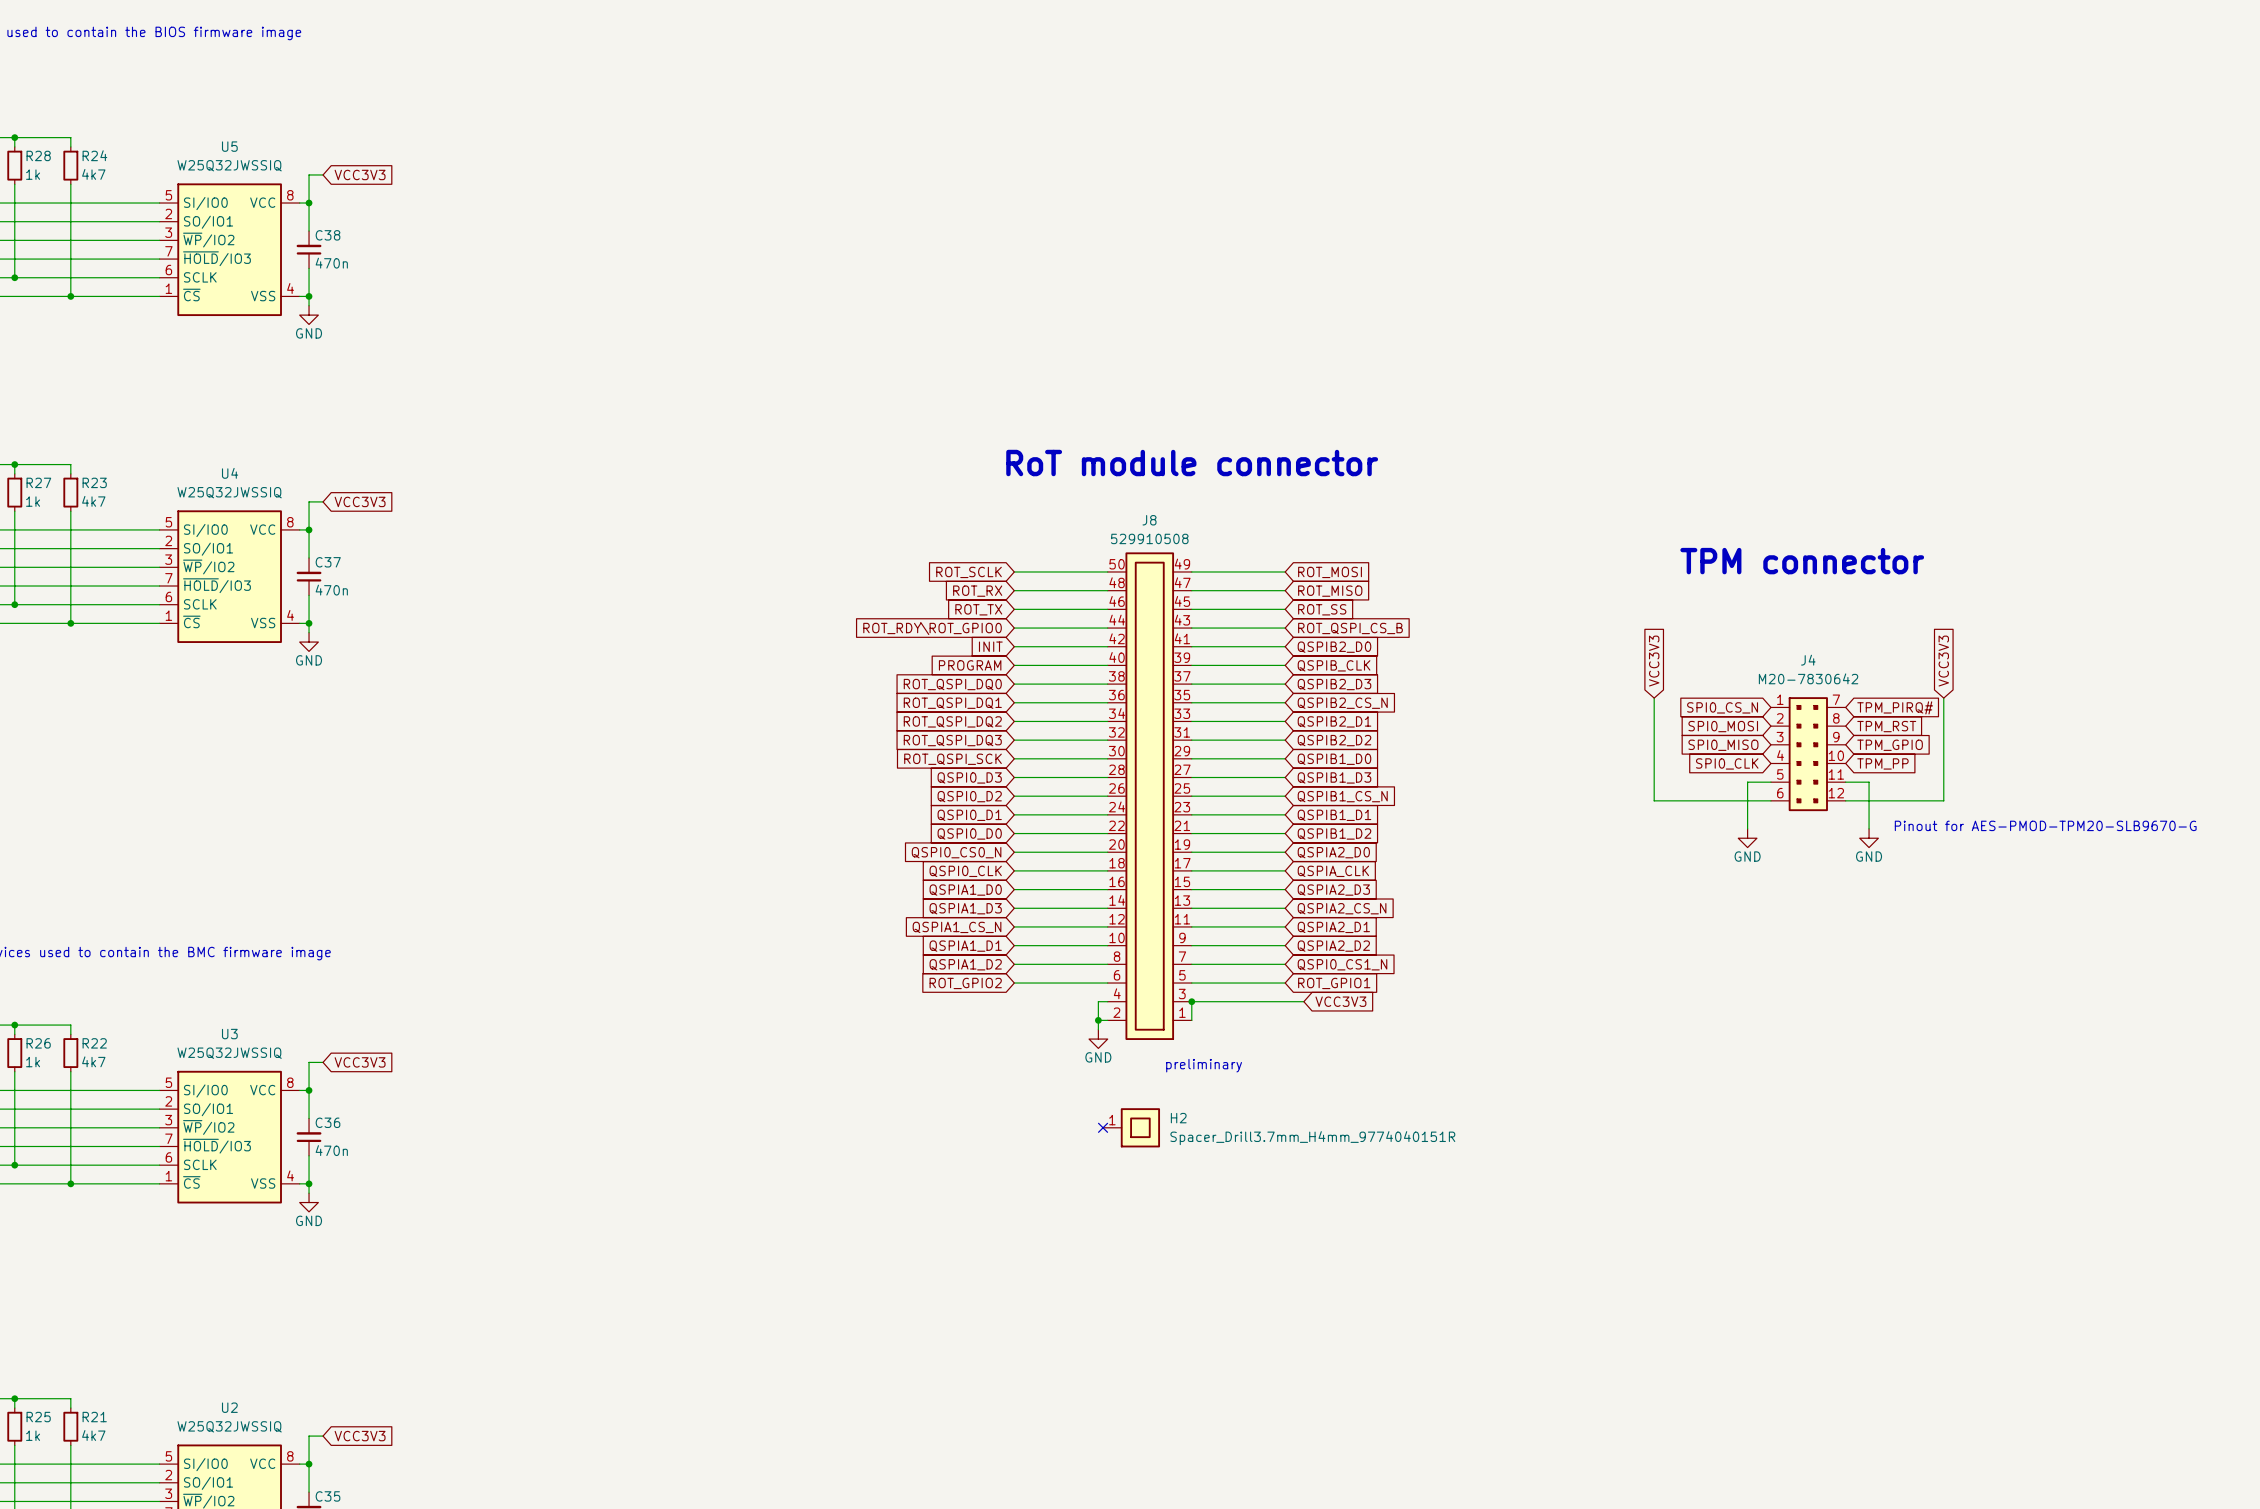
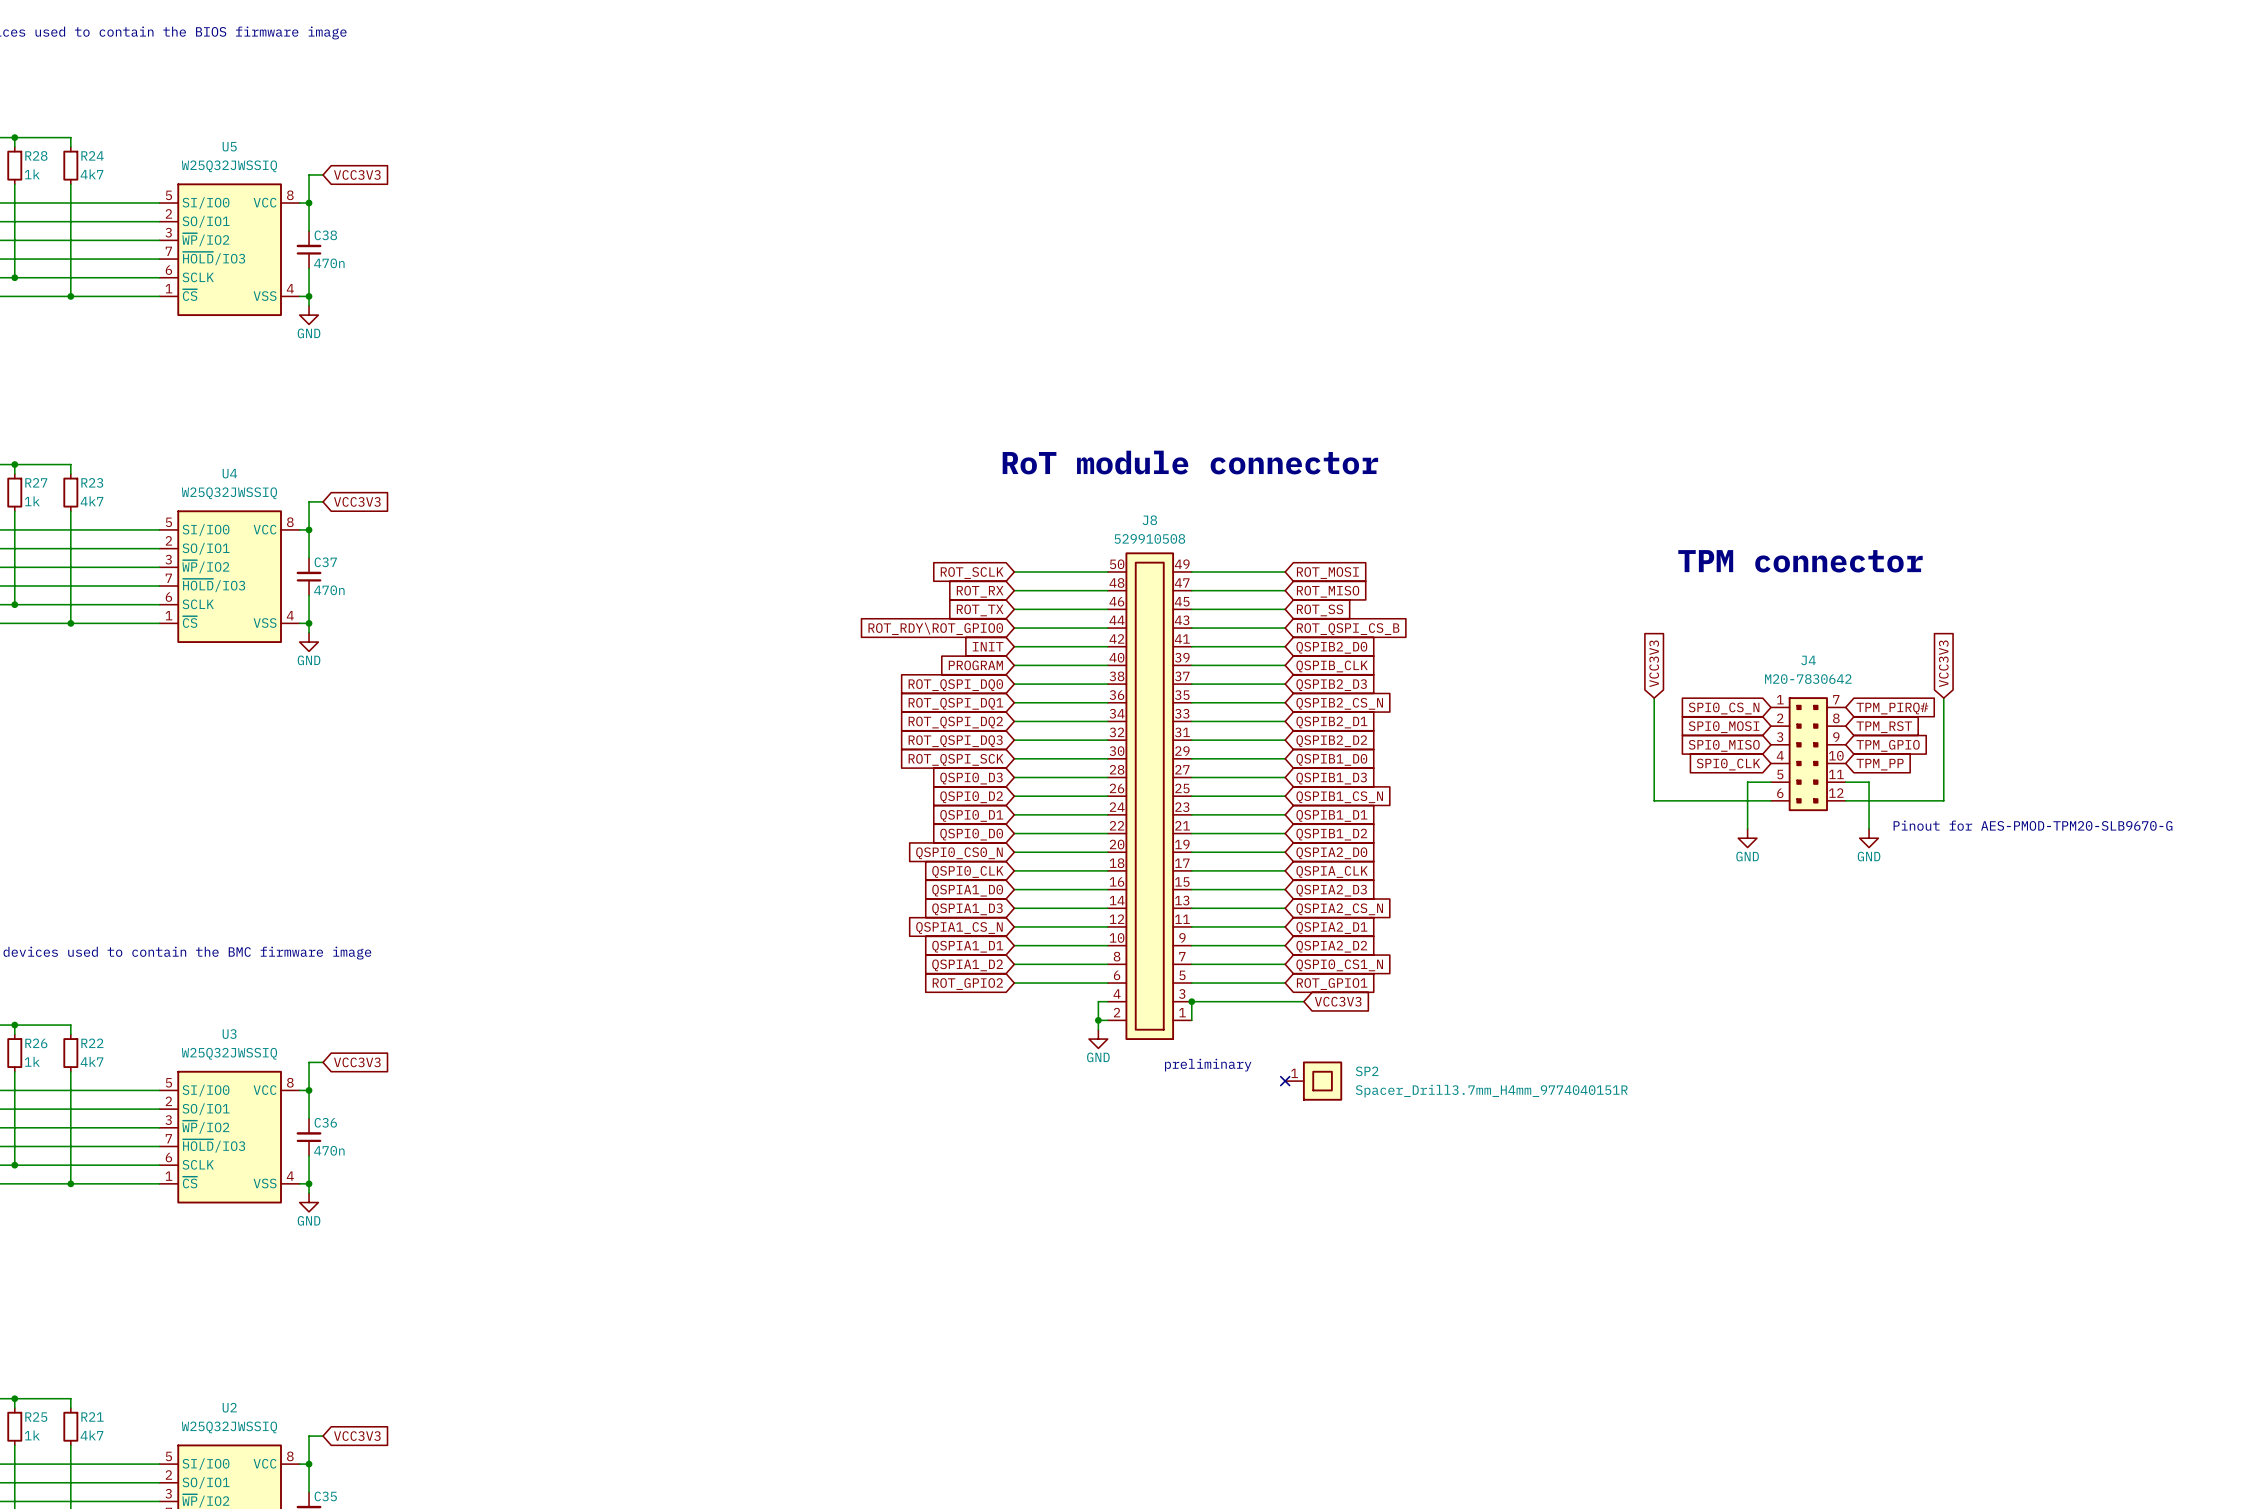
no-connect mark: none -> (1285, 1081)
SP2: none -> Spacer_Drill3.7mm_H4mm_9774040151R (1313, 1081)
no-connect mark: (1103, 1127) -> none
H2: Spacer_Drill3.7mm_H4mm_9774040151R (1131, 1127) -> none

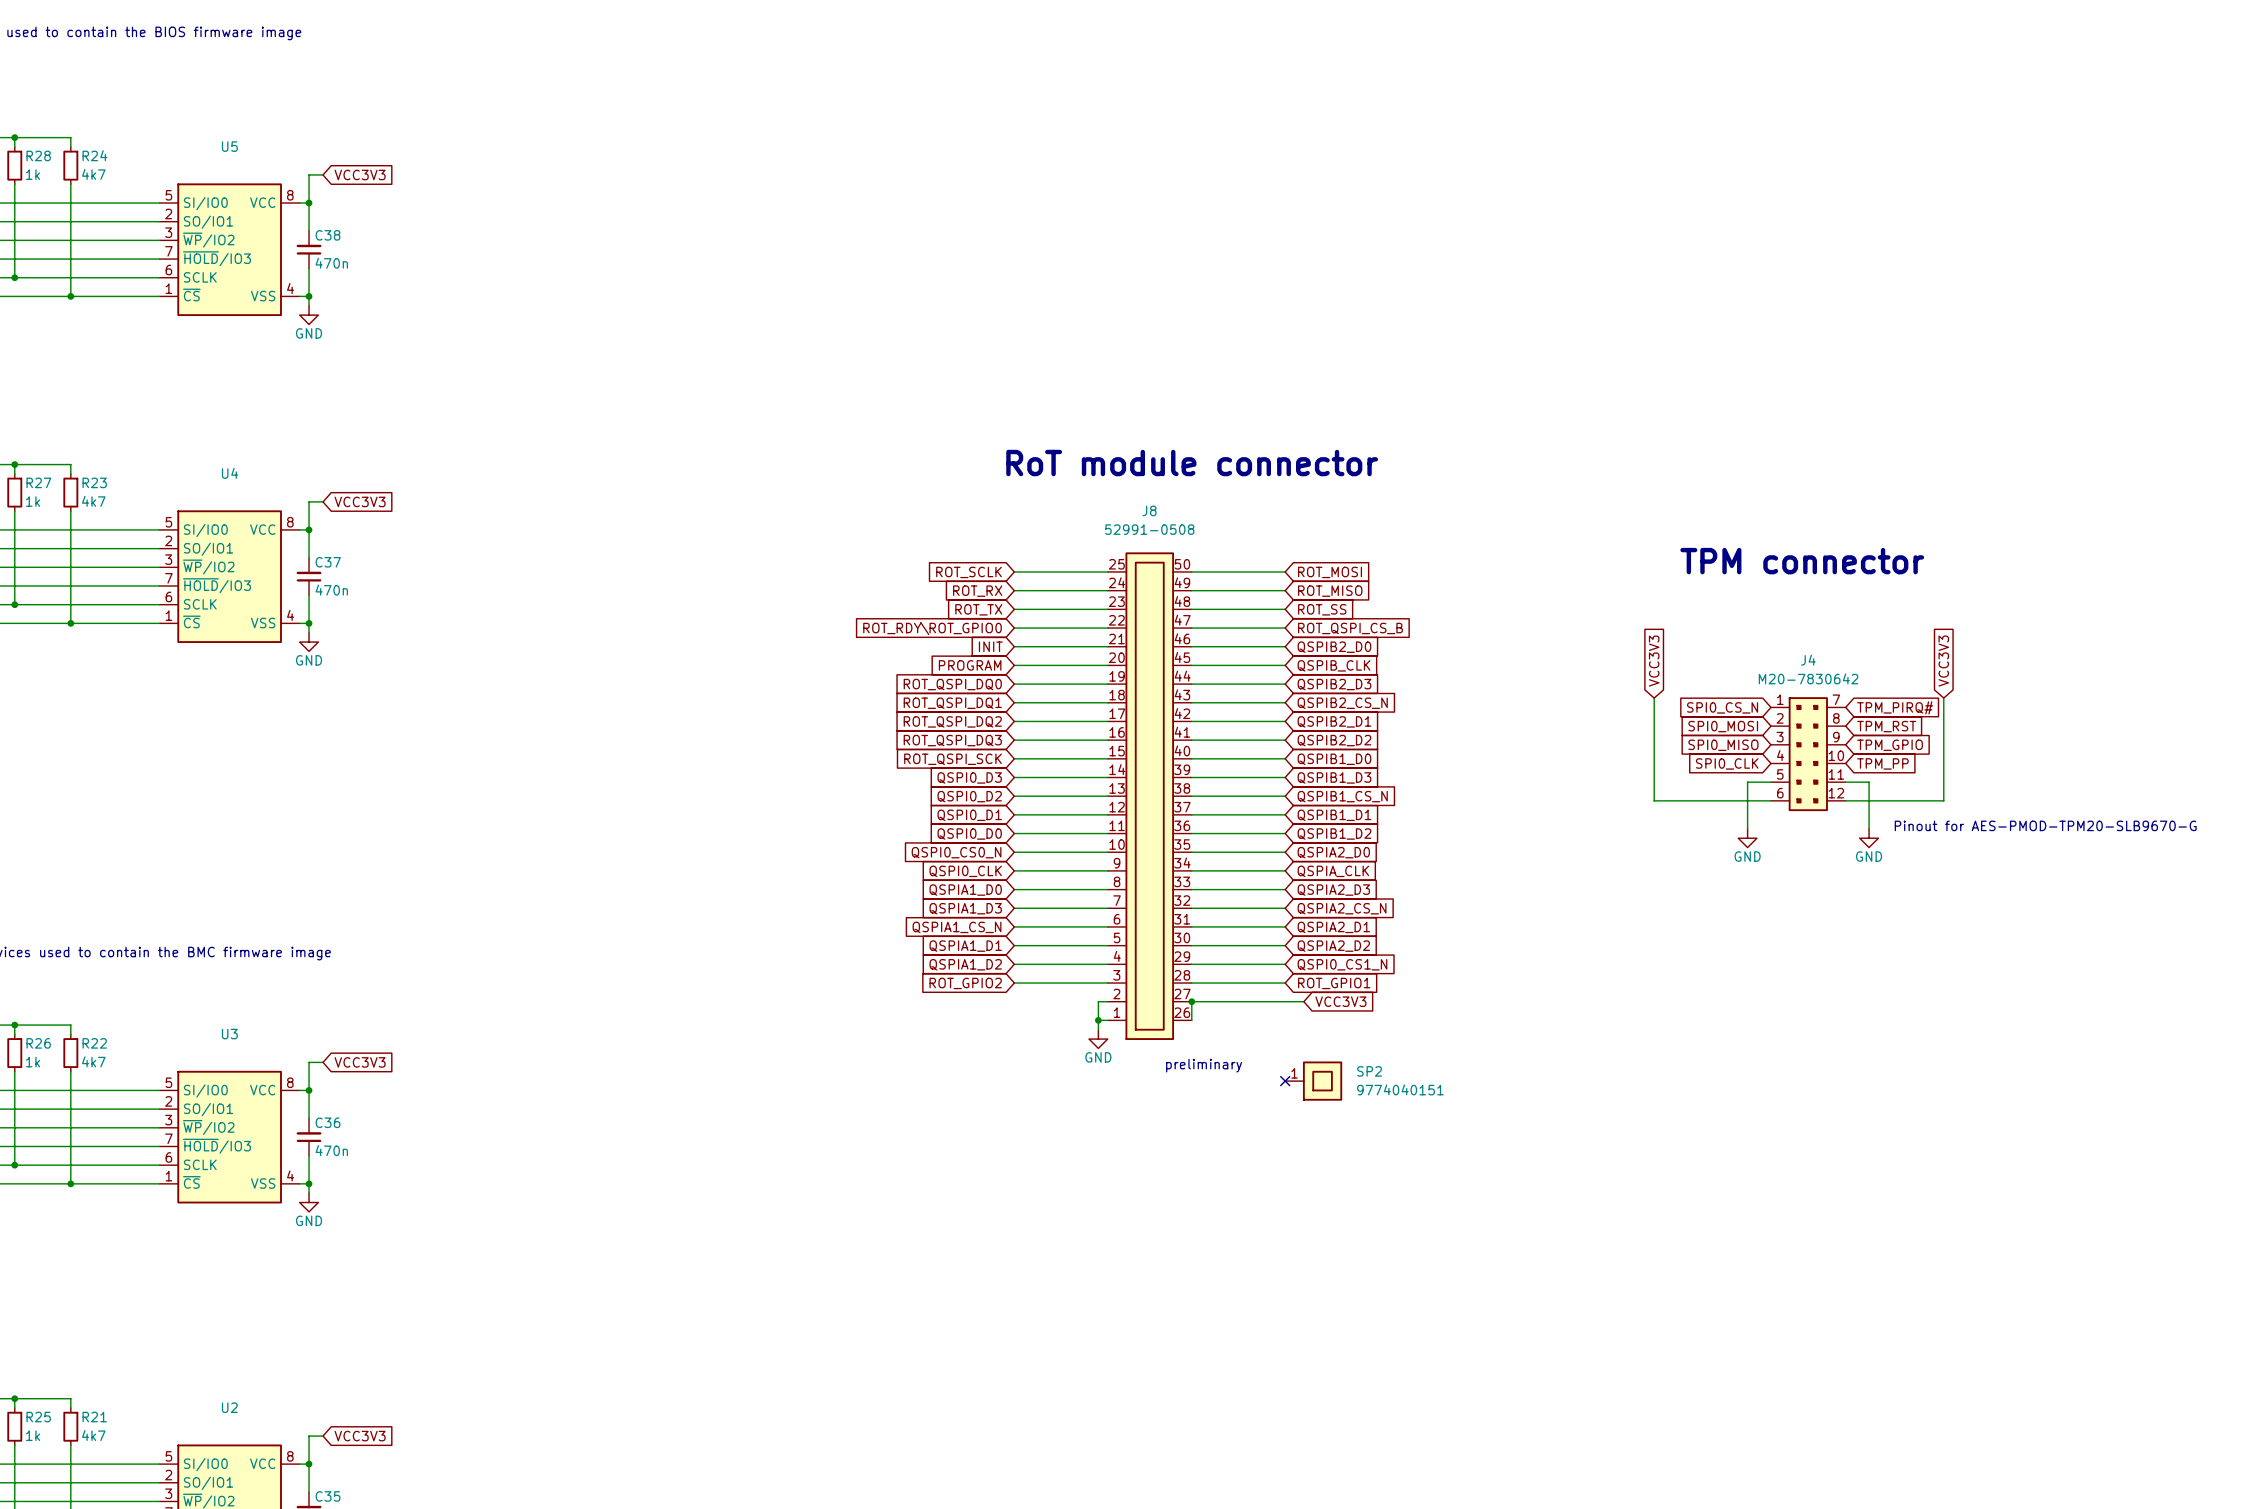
U5 text: W25Q32JWSSIQ (229, 166) -> none
U4 text: W25Q32JWSSIQ (229, 493) -> none
J8 text: 529910508 (1149, 538) -> 52991-0508 (1149, 529)
J8 symbol: [1107, 552, 1192, 1040] -> [1107, 552, 1192, 1040]
U3 text: W25Q32JWSSIQ (229, 1053) -> none
SP2 value: Spacer_Drill3.7mm_H4mm_9774040151R (1491, 1091) -> 9774040151 (1400, 1089)
U2 text: W25Q32JWSSIQ (229, 1427) -> none

